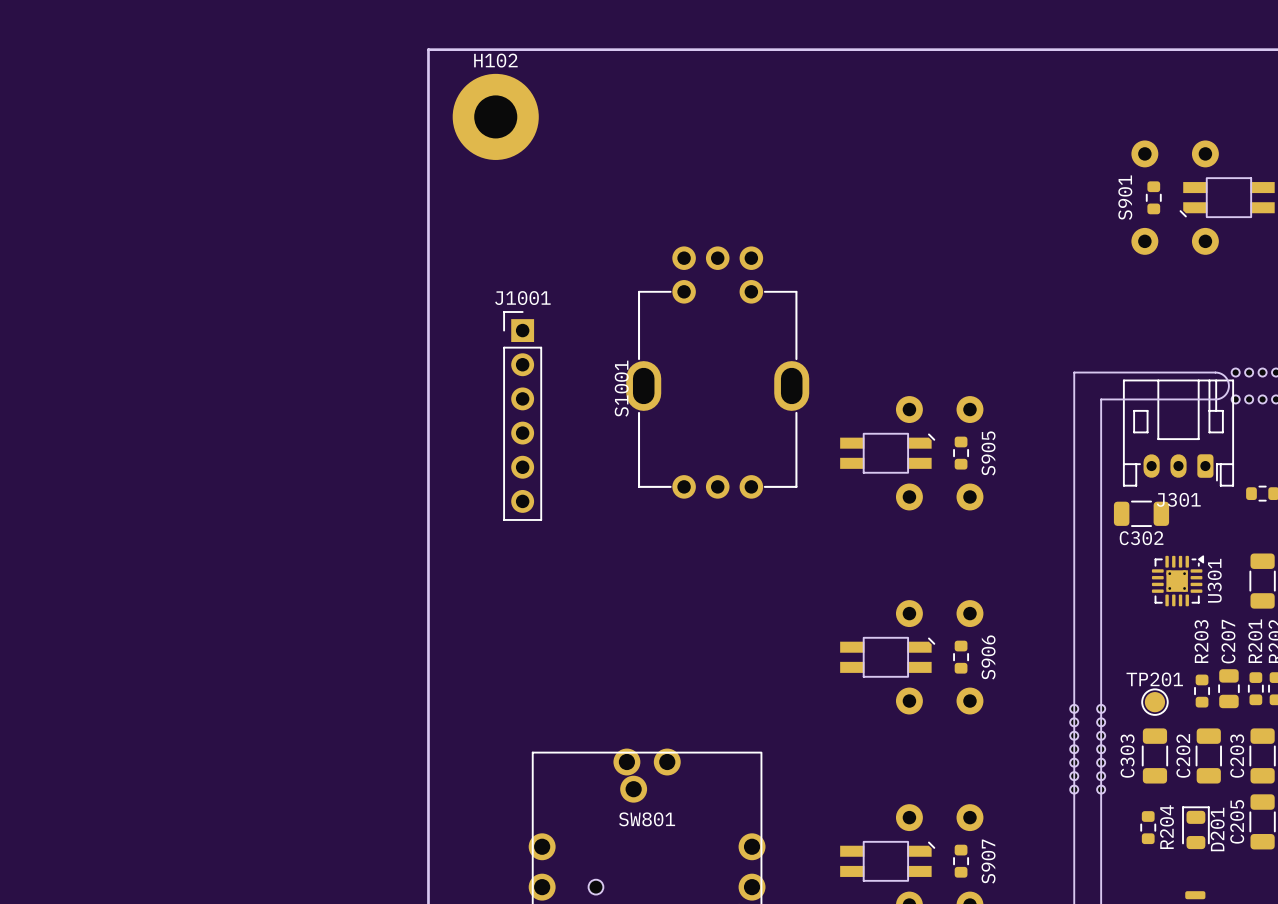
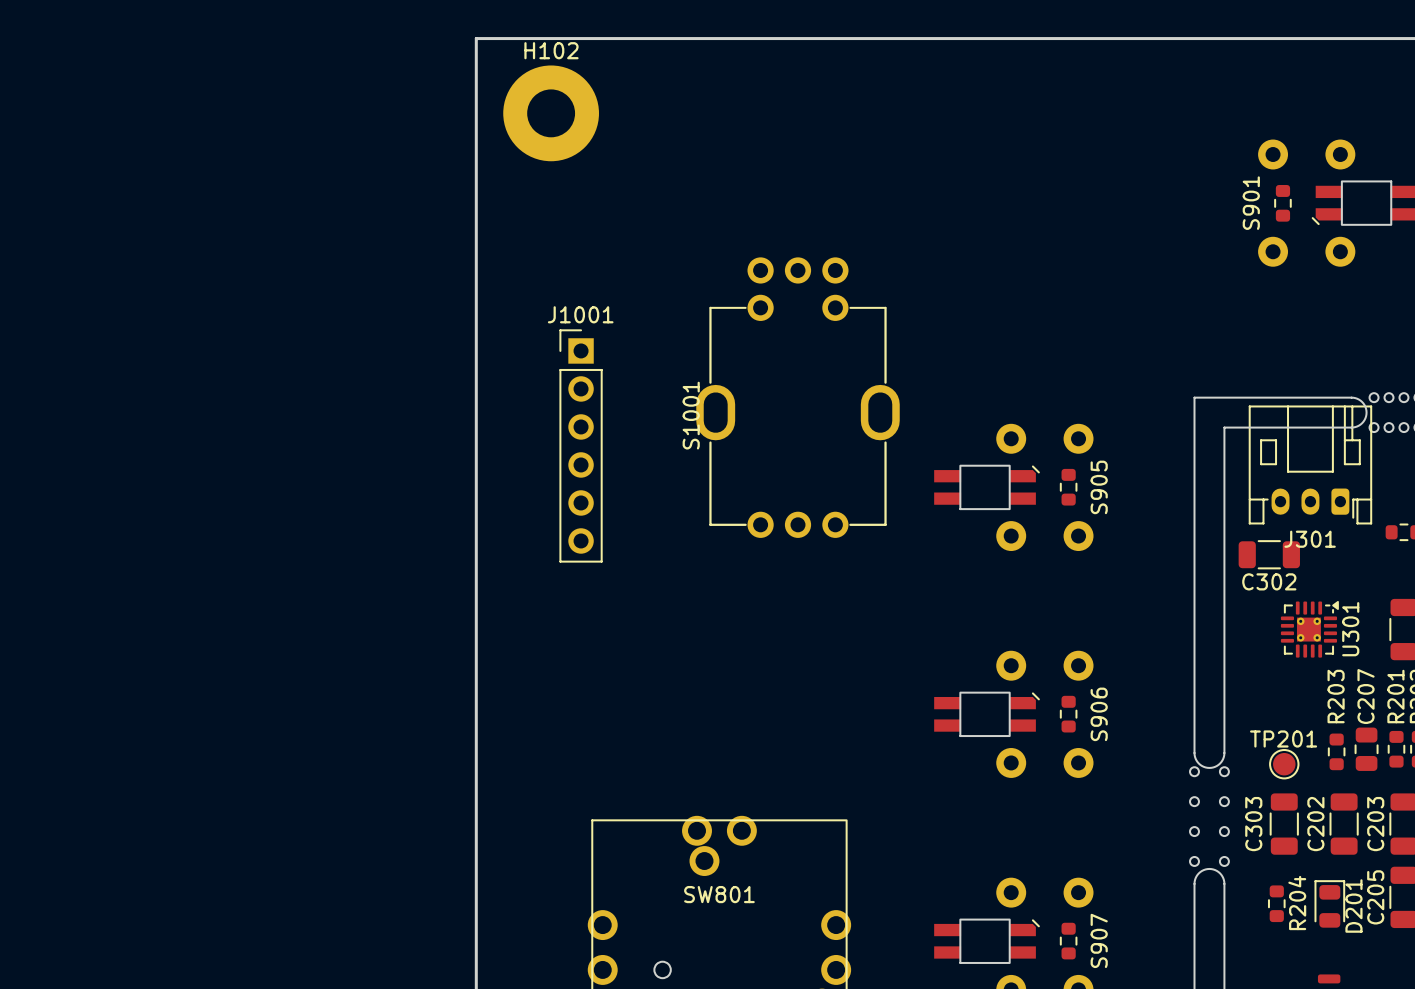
board edge: (1074, 692) (1074, 809) -> (1194, 752) (1198, 763) (1209, 767) (1220, 763) (1224, 752)
board edge: (1101, 692) (1101, 809) -> (1194, 883) (1198, 873) (1209, 868) (1220, 873) (1224, 883)
part footprint: [1070, 704, 1106, 794] -> [1190, 767, 1229, 866]

